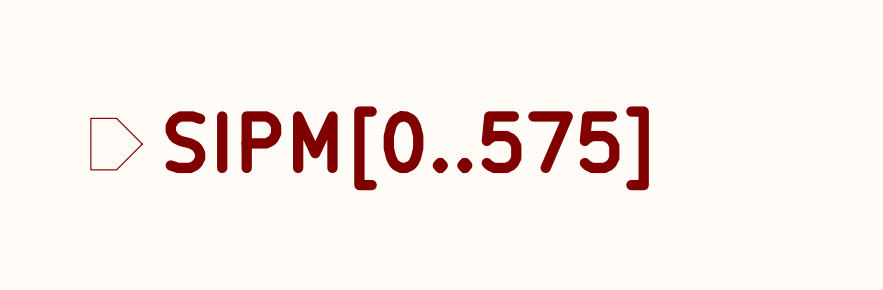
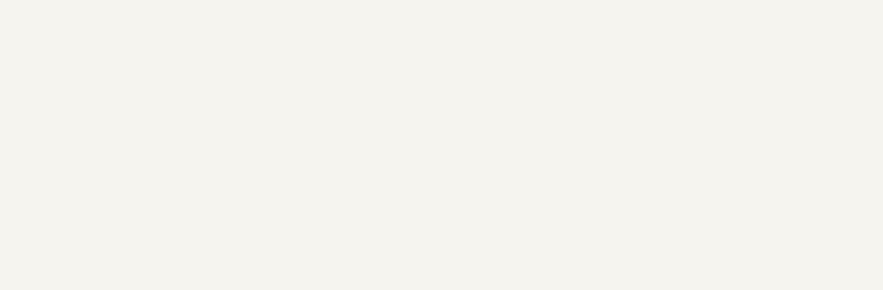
hierarchical label: SIPM[0..575] (407, 148) -> none

